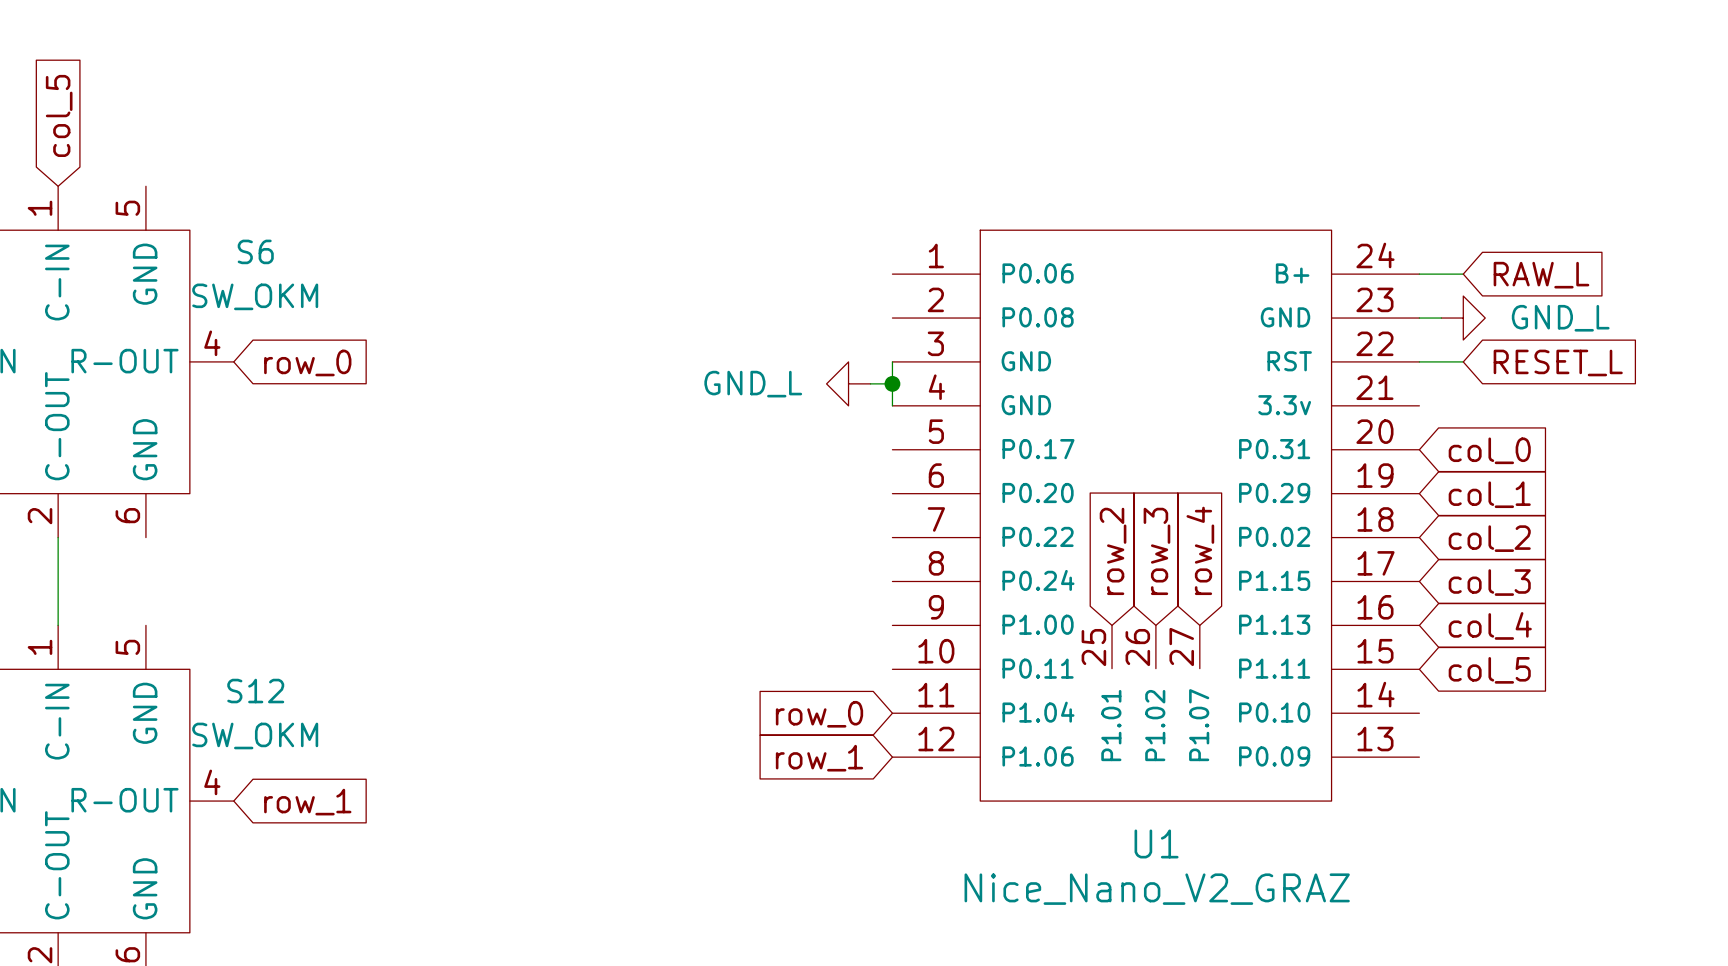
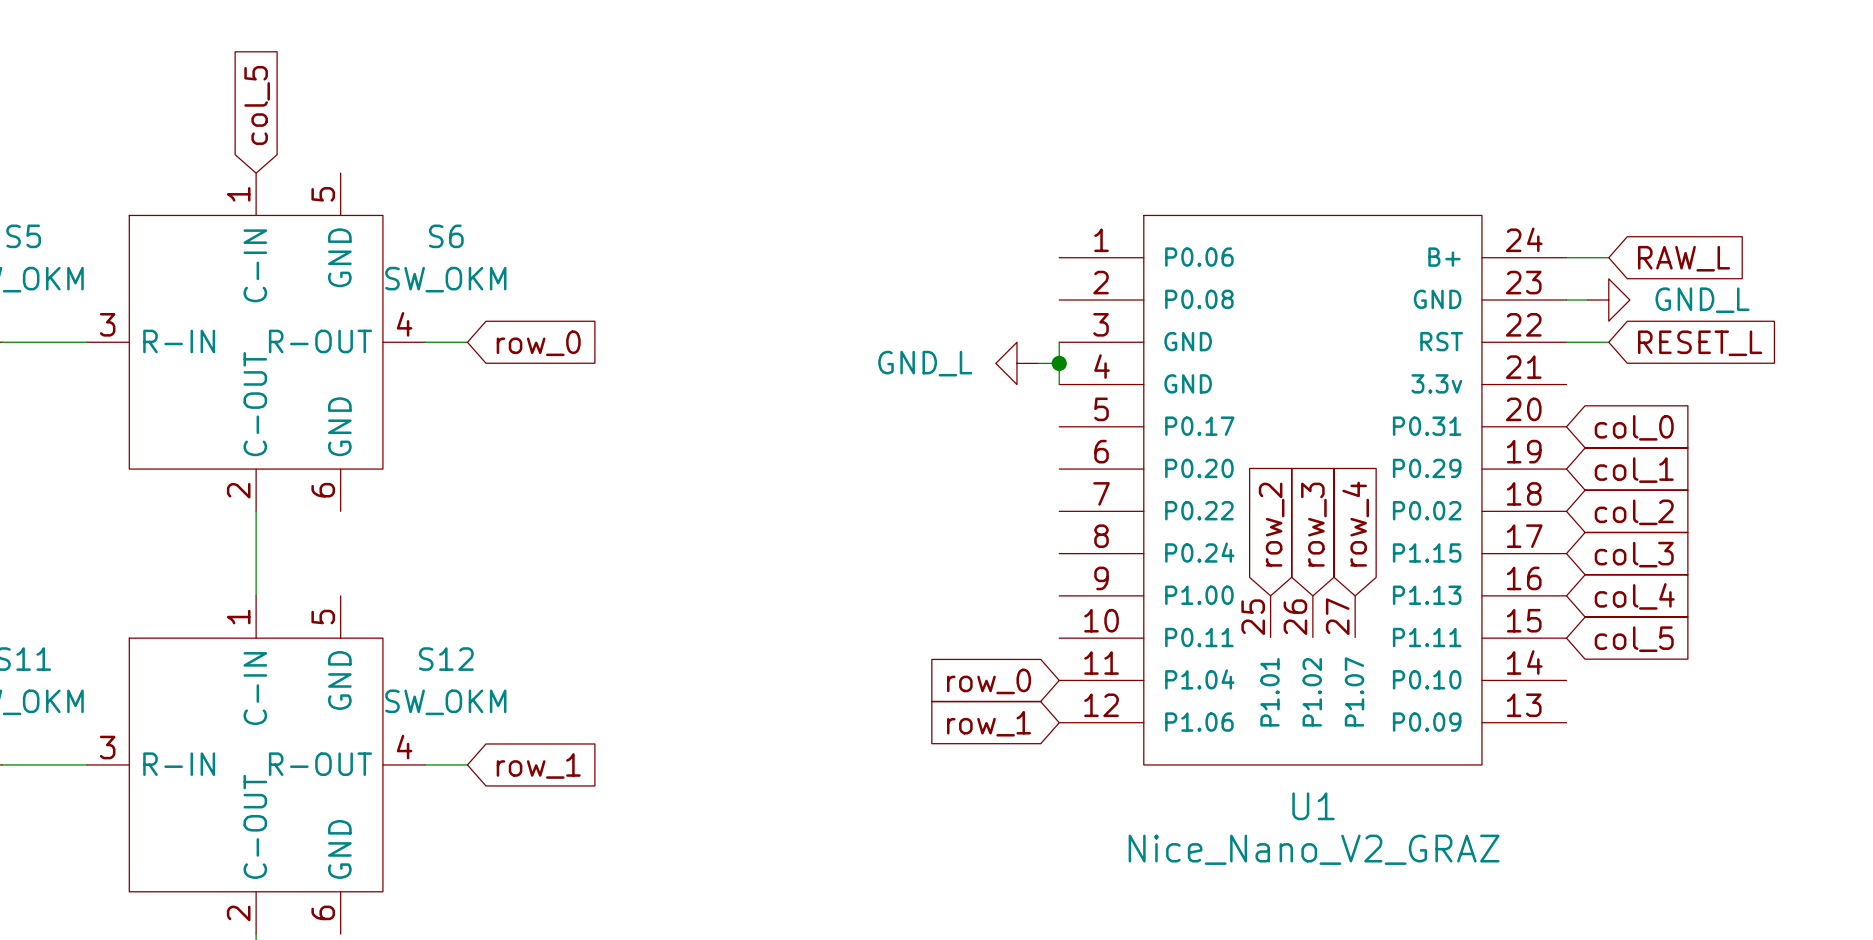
wire: none -> (425, 342) (467, 342)
global label position: row_0 (307, 362) -> row_0 (538, 343)
wire: none -> (425, 764) (467, 764)
global label position: row_1 (307, 802) -> row_1 (538, 765)

